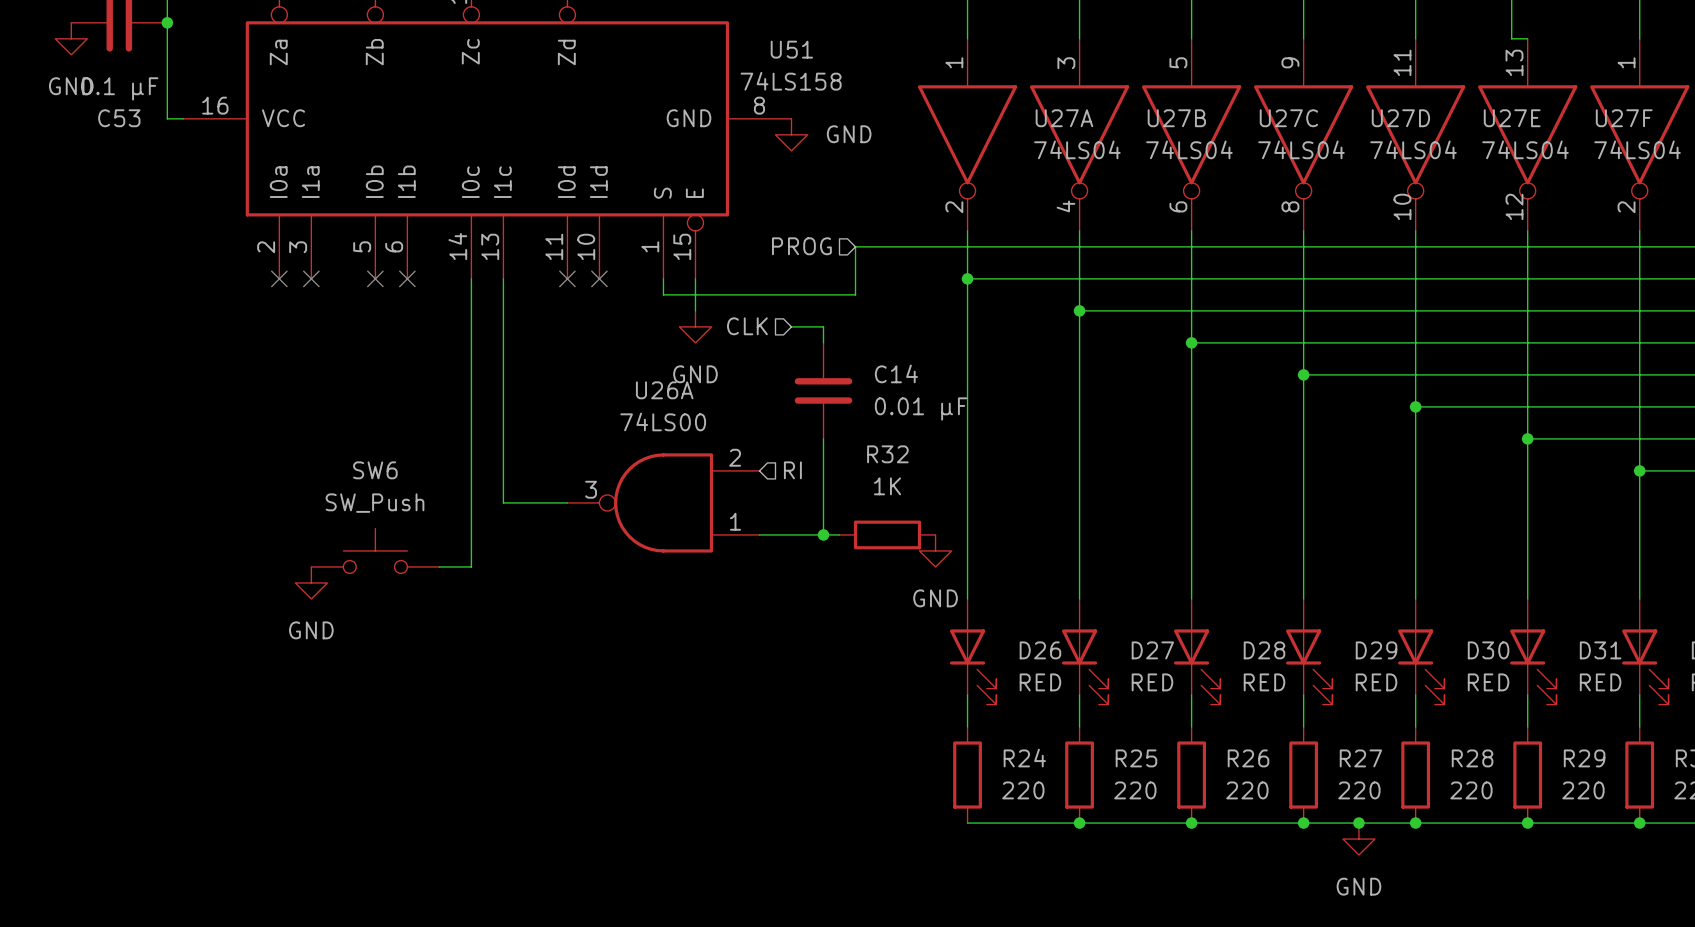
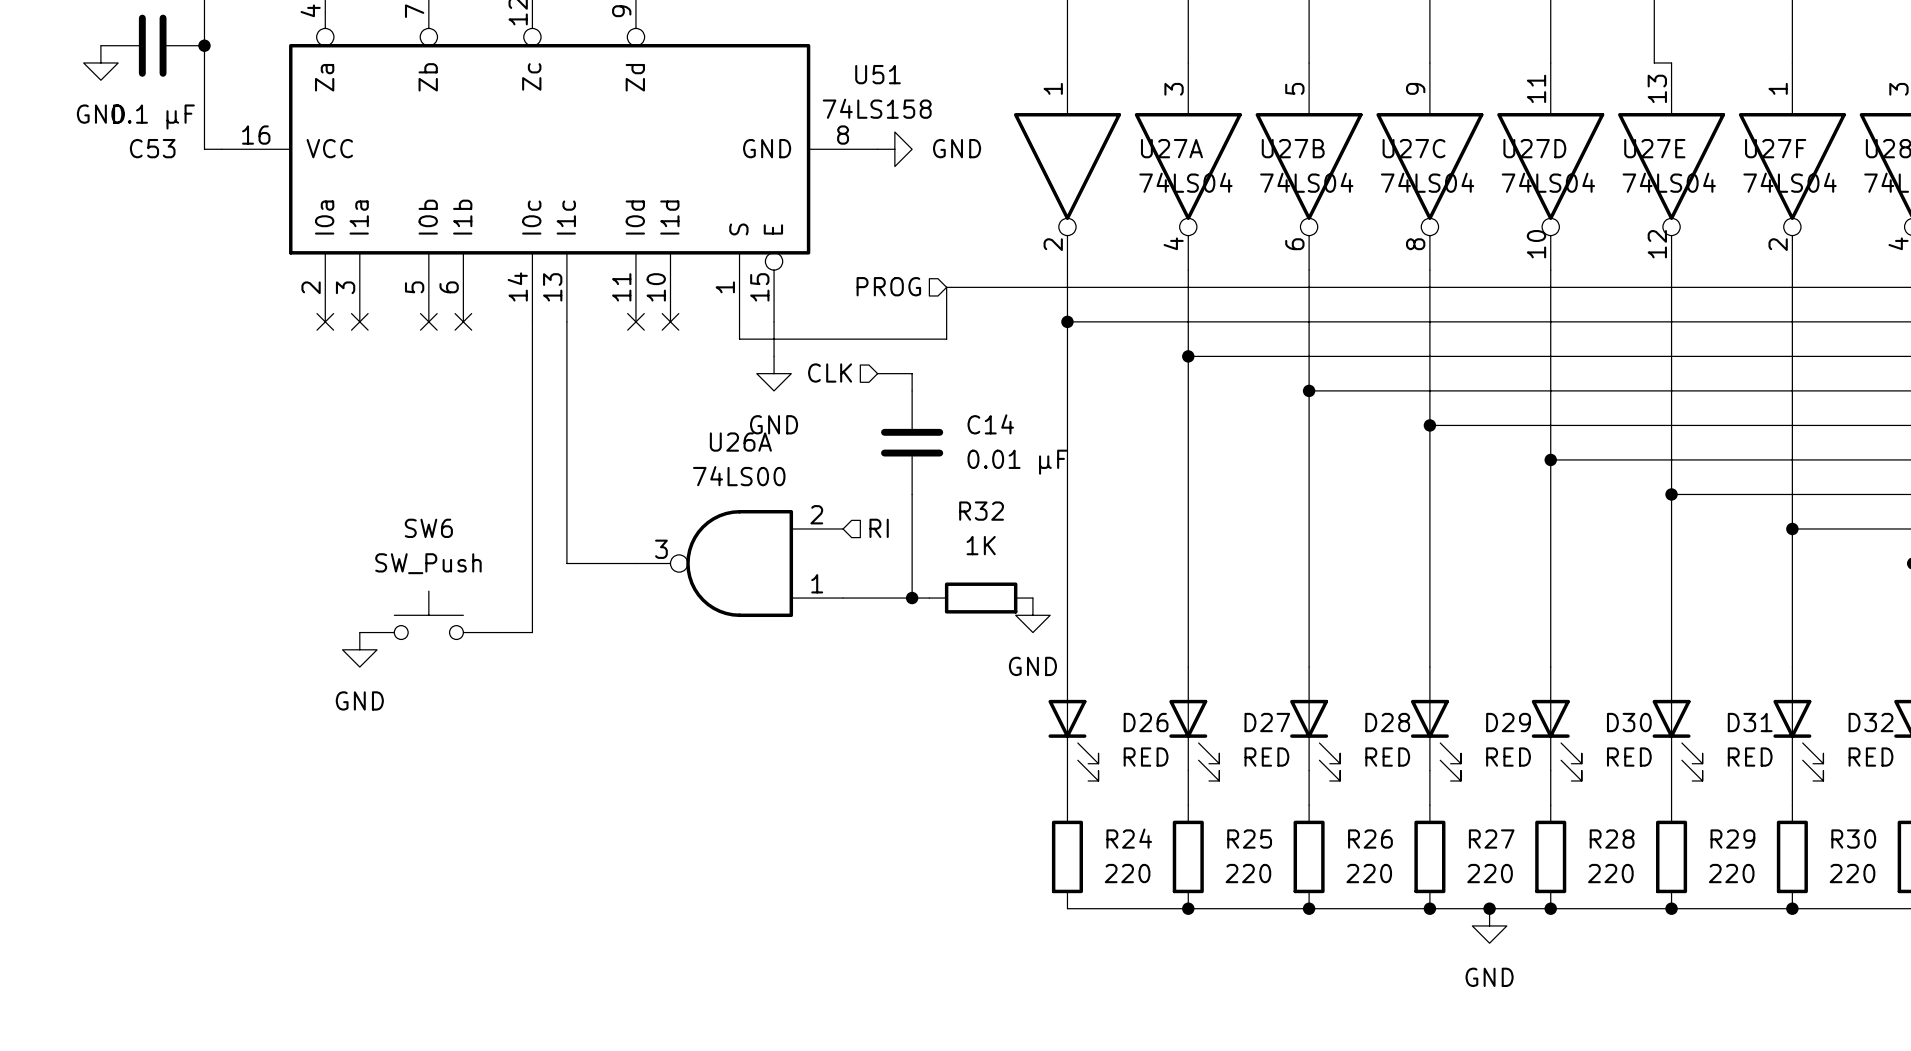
power symbol rotation: 0° (791, 134) -> 90° counterclockwise (894, 149)
power symbol position: GND (791, 134) -> GND (894, 149)

